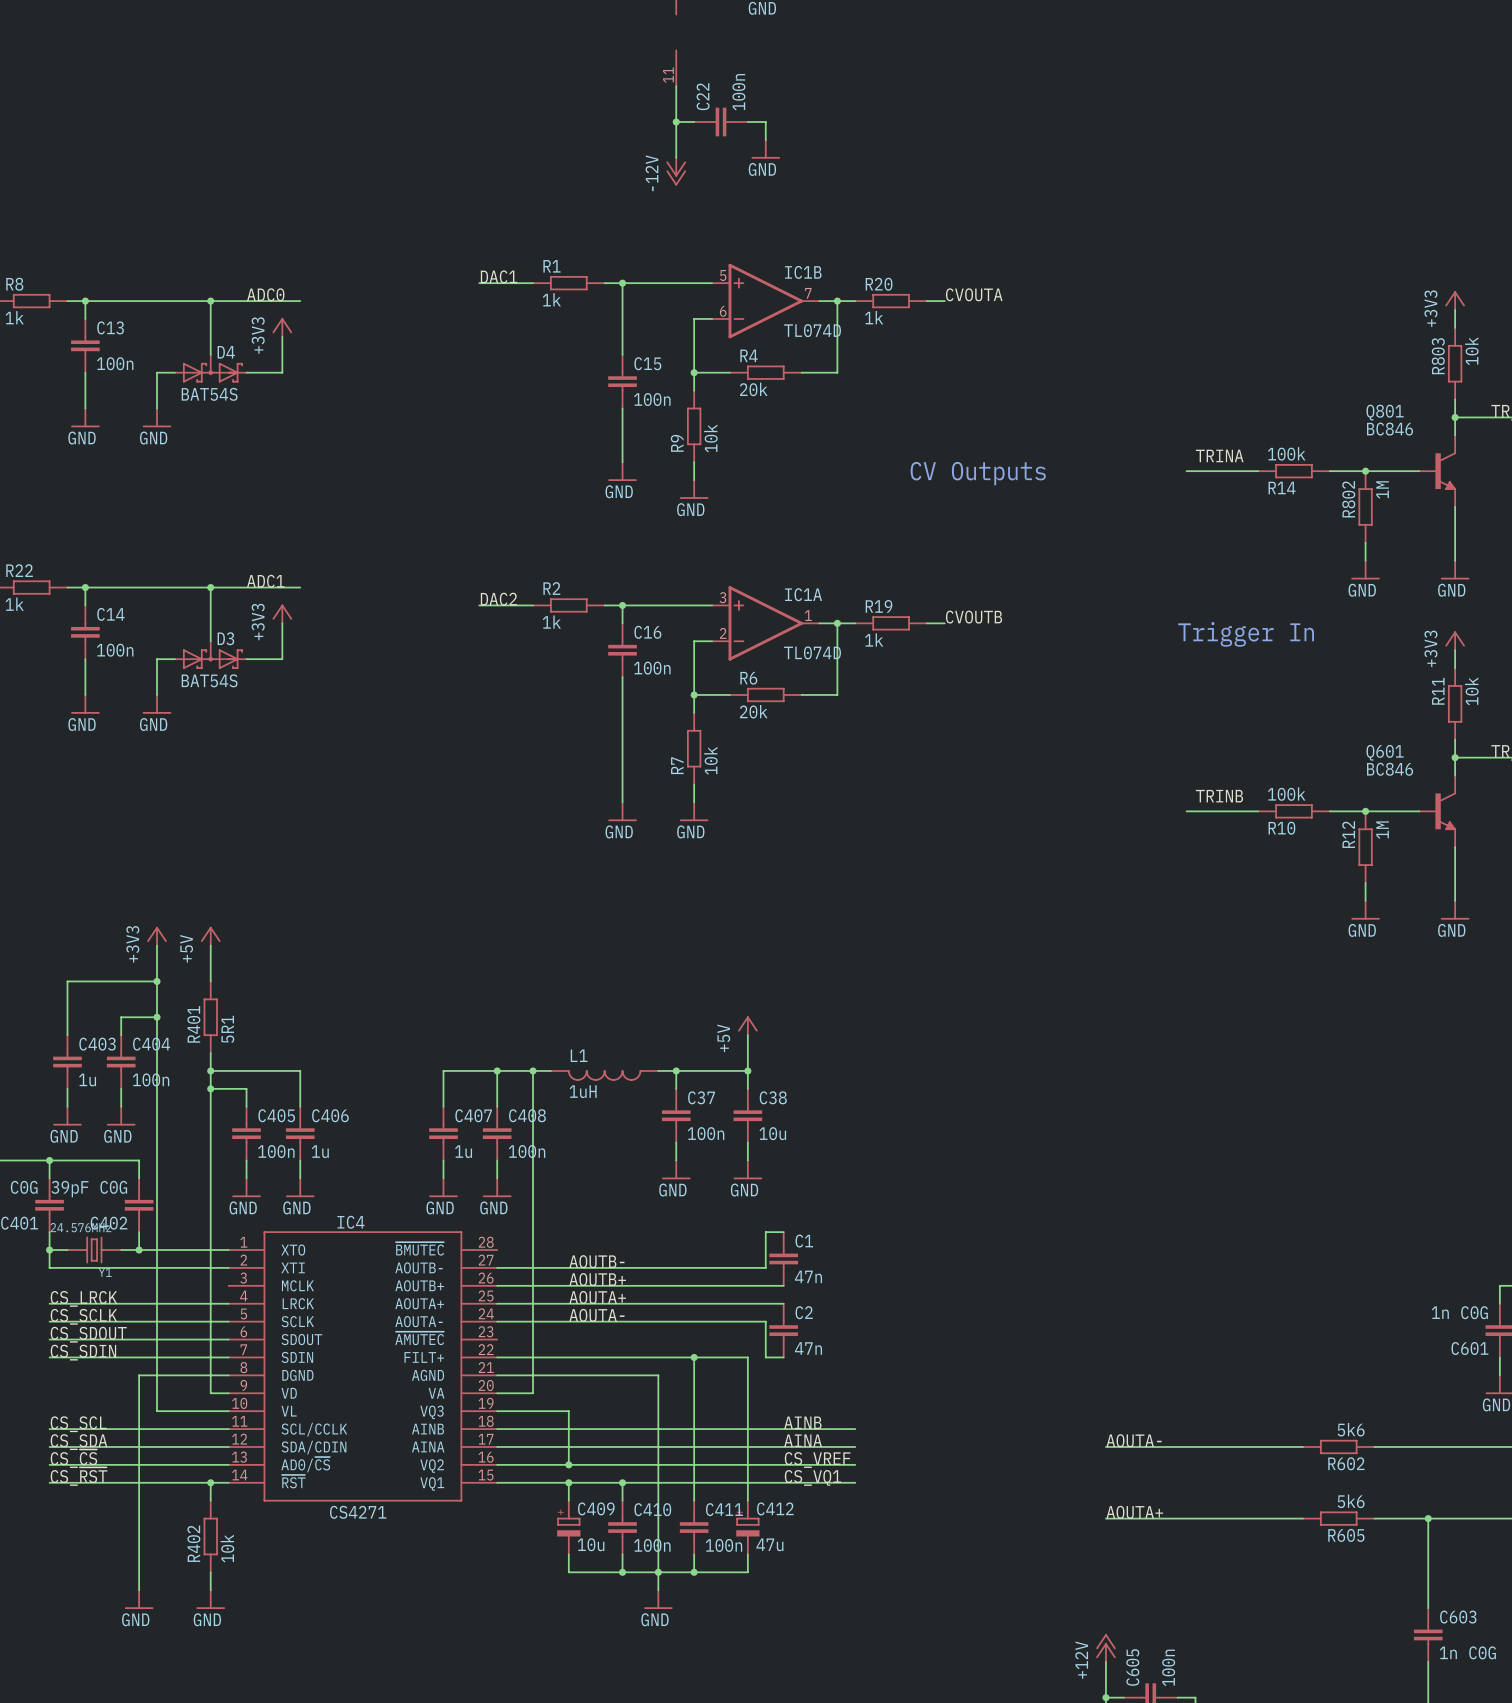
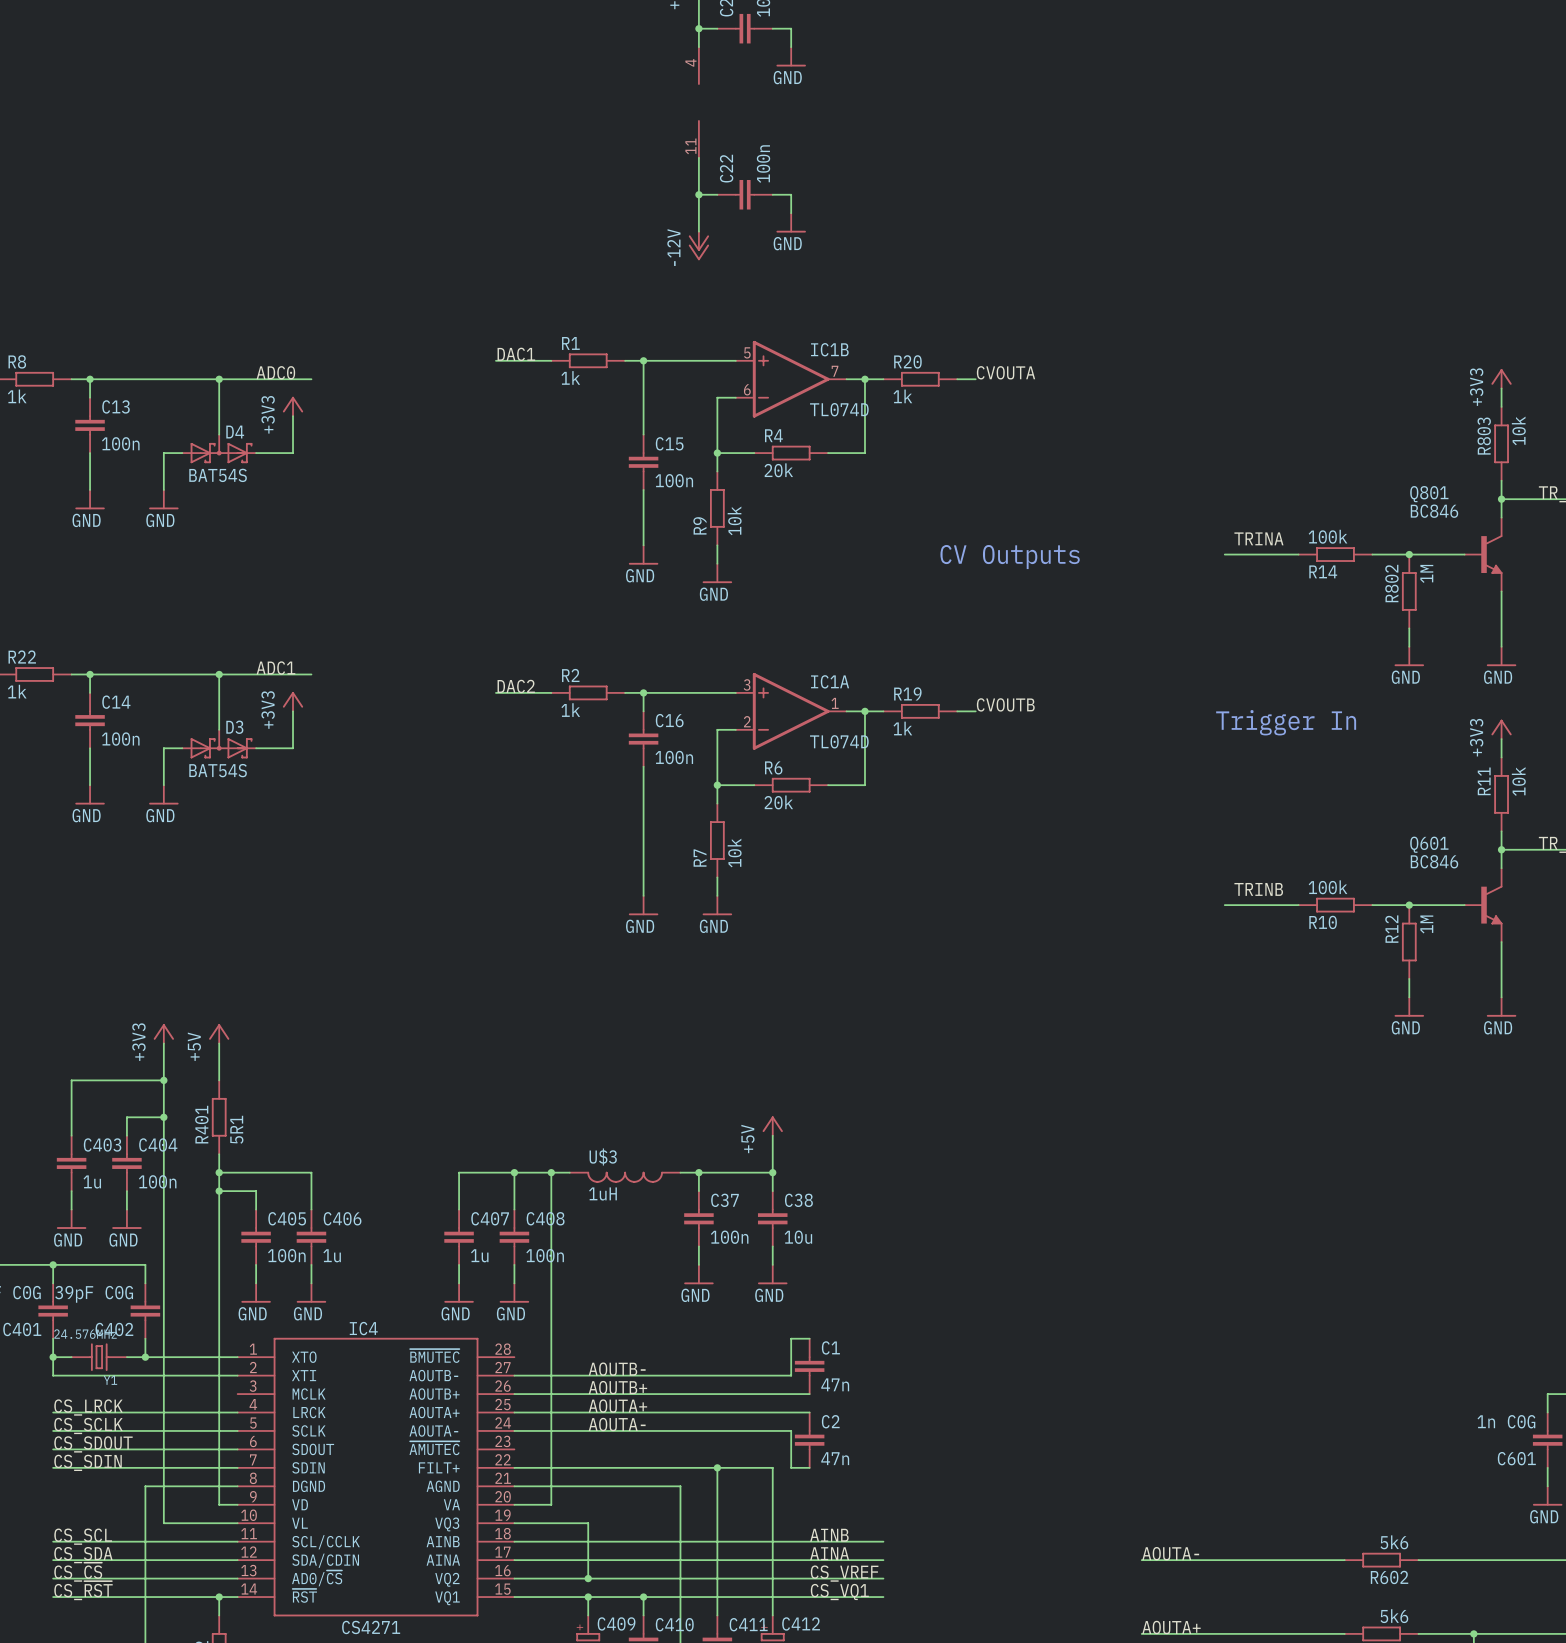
L1 name: L1 (579, 1055) -> U$3 (603, 1156)

